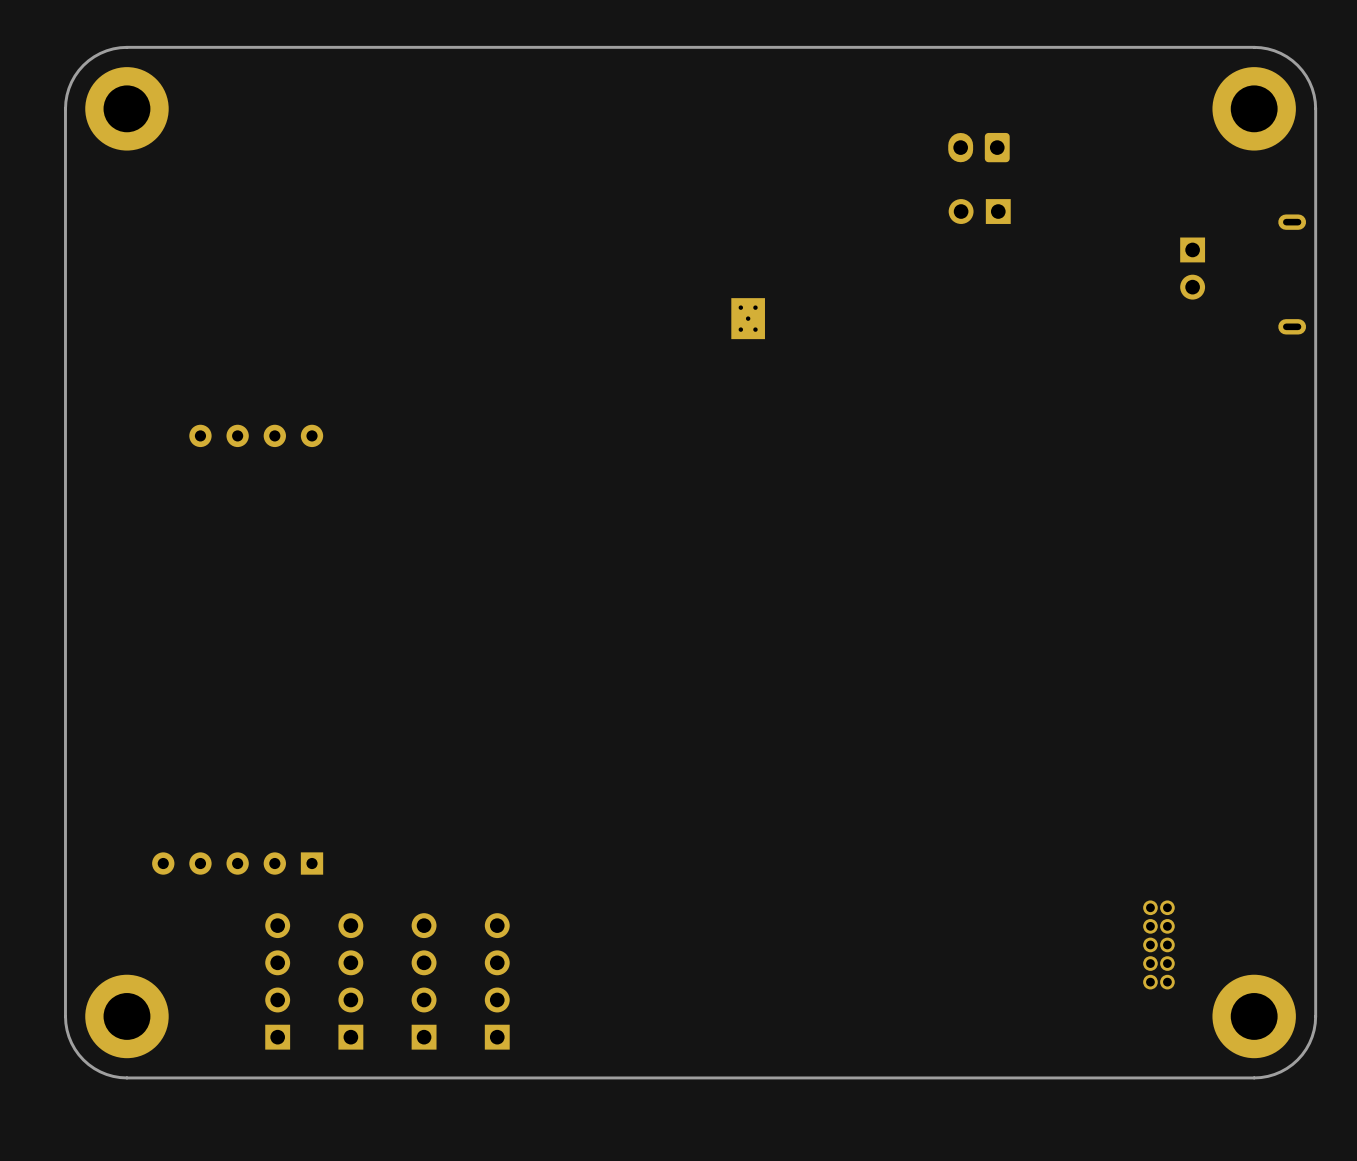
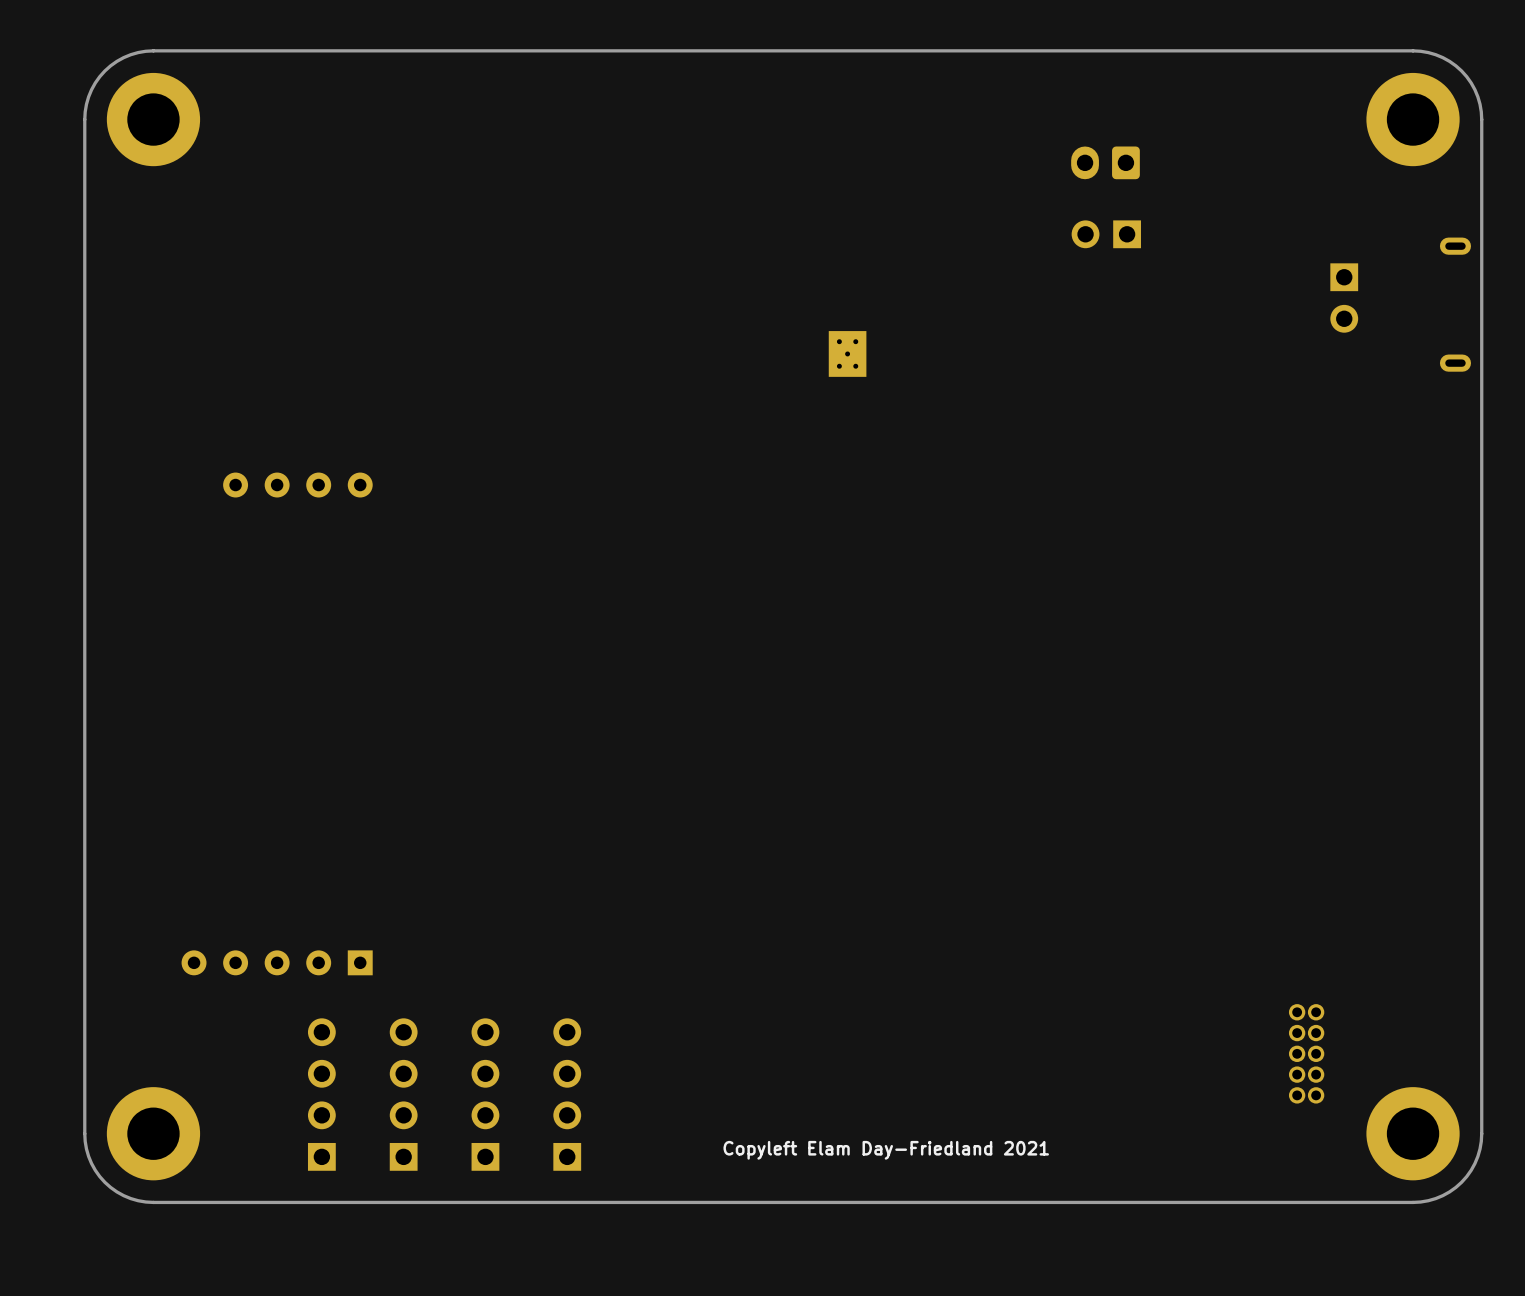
text: none -> Copyleft Elam Day-Friedland 2021 (886, 1150)

